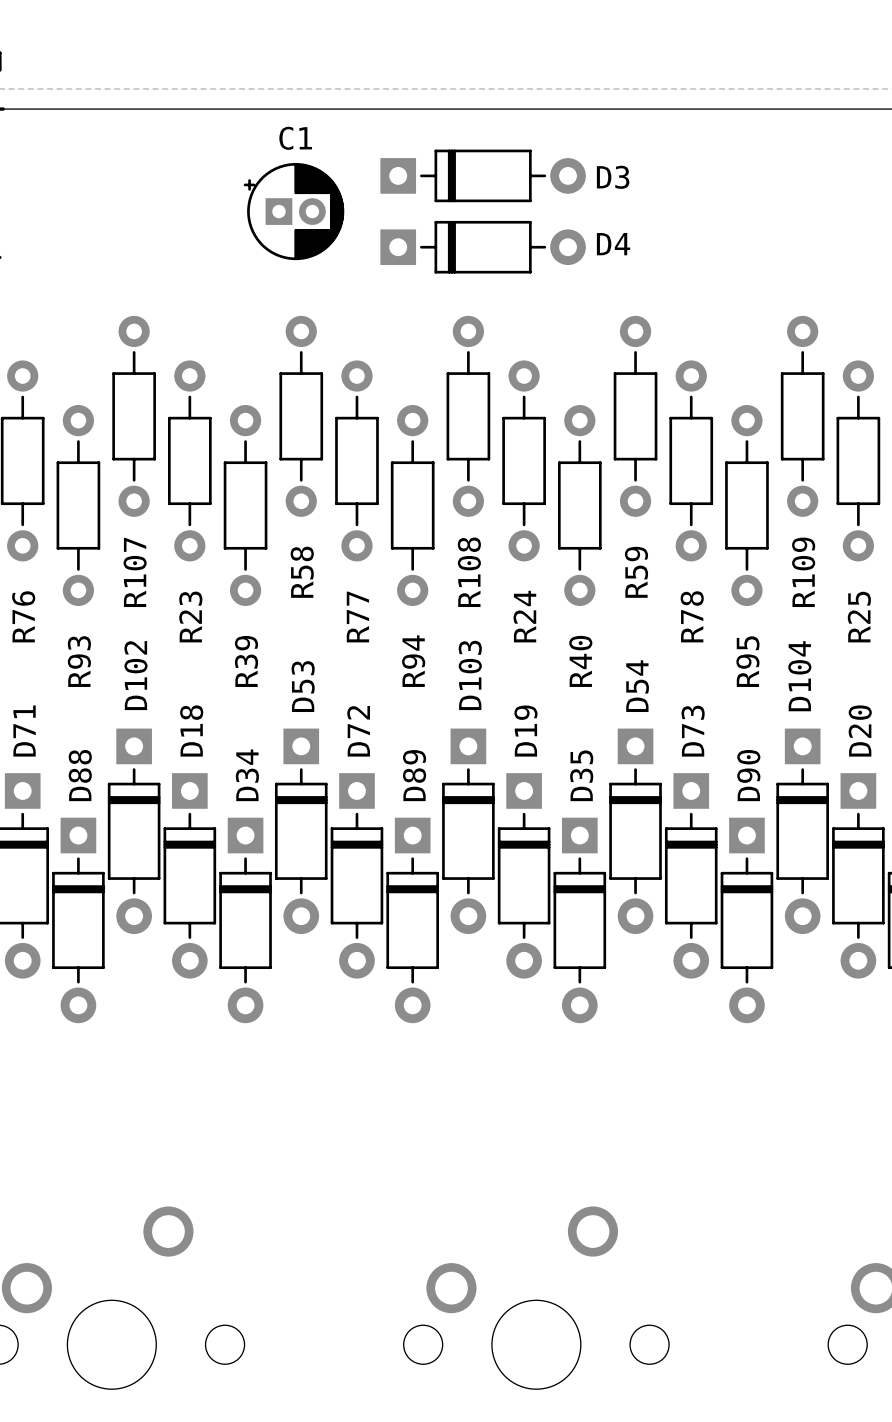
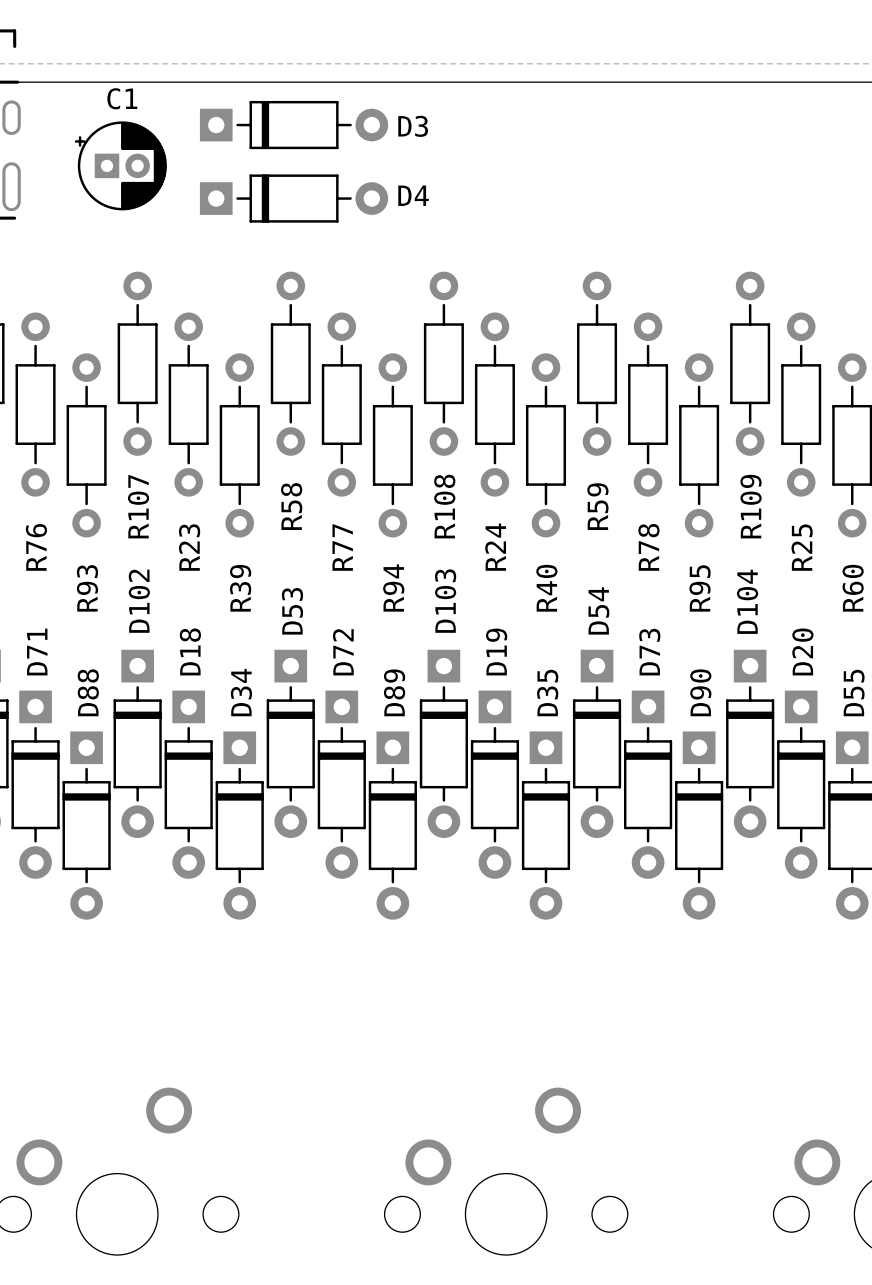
D3 position: (483, 175) -> (294, 125)
C1 position: (294, 211) -> (120, 165)
D4 position: (483, 247) -> (294, 198)

